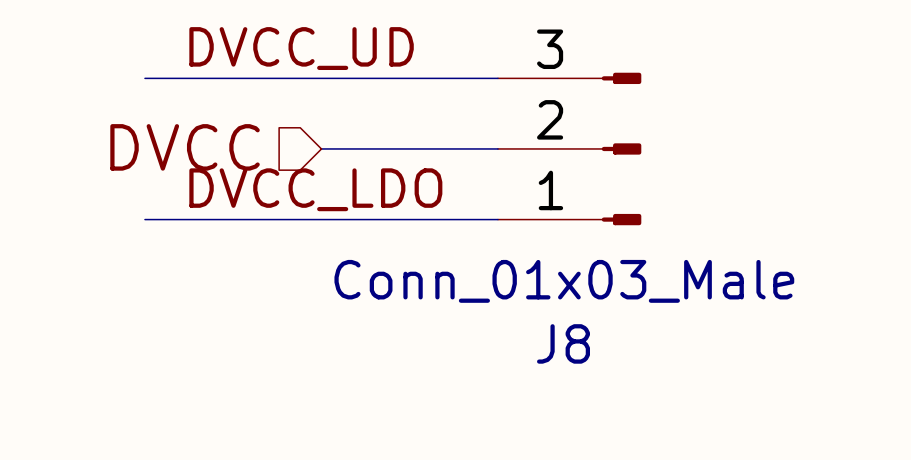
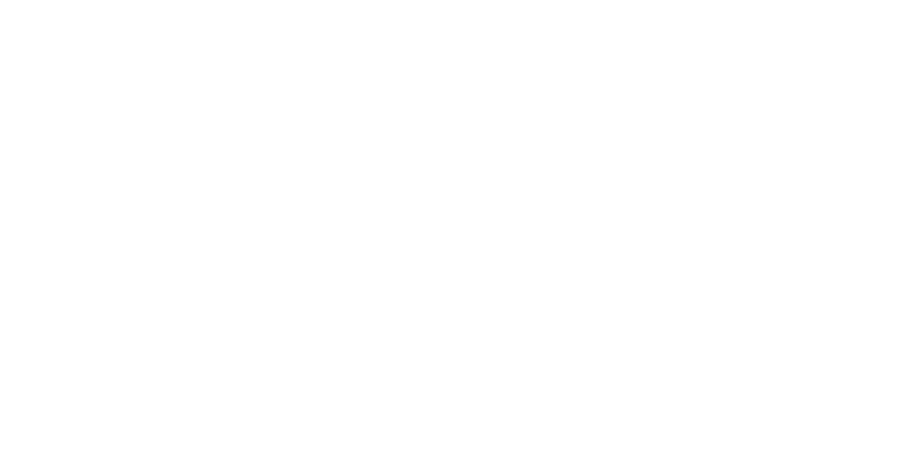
label: DVCC_UD (301, 48) -> none
wire: (144, 78) (497, 78) -> none
hierarchical label: DVCC (185, 147) -> none
wire: (321, 148) (497, 148) -> none
J8: Conn_01x03_Male (569, 148) -> none
label: DVCC_LDO (315, 189) -> none
wire: (144, 219) (497, 219) -> none

